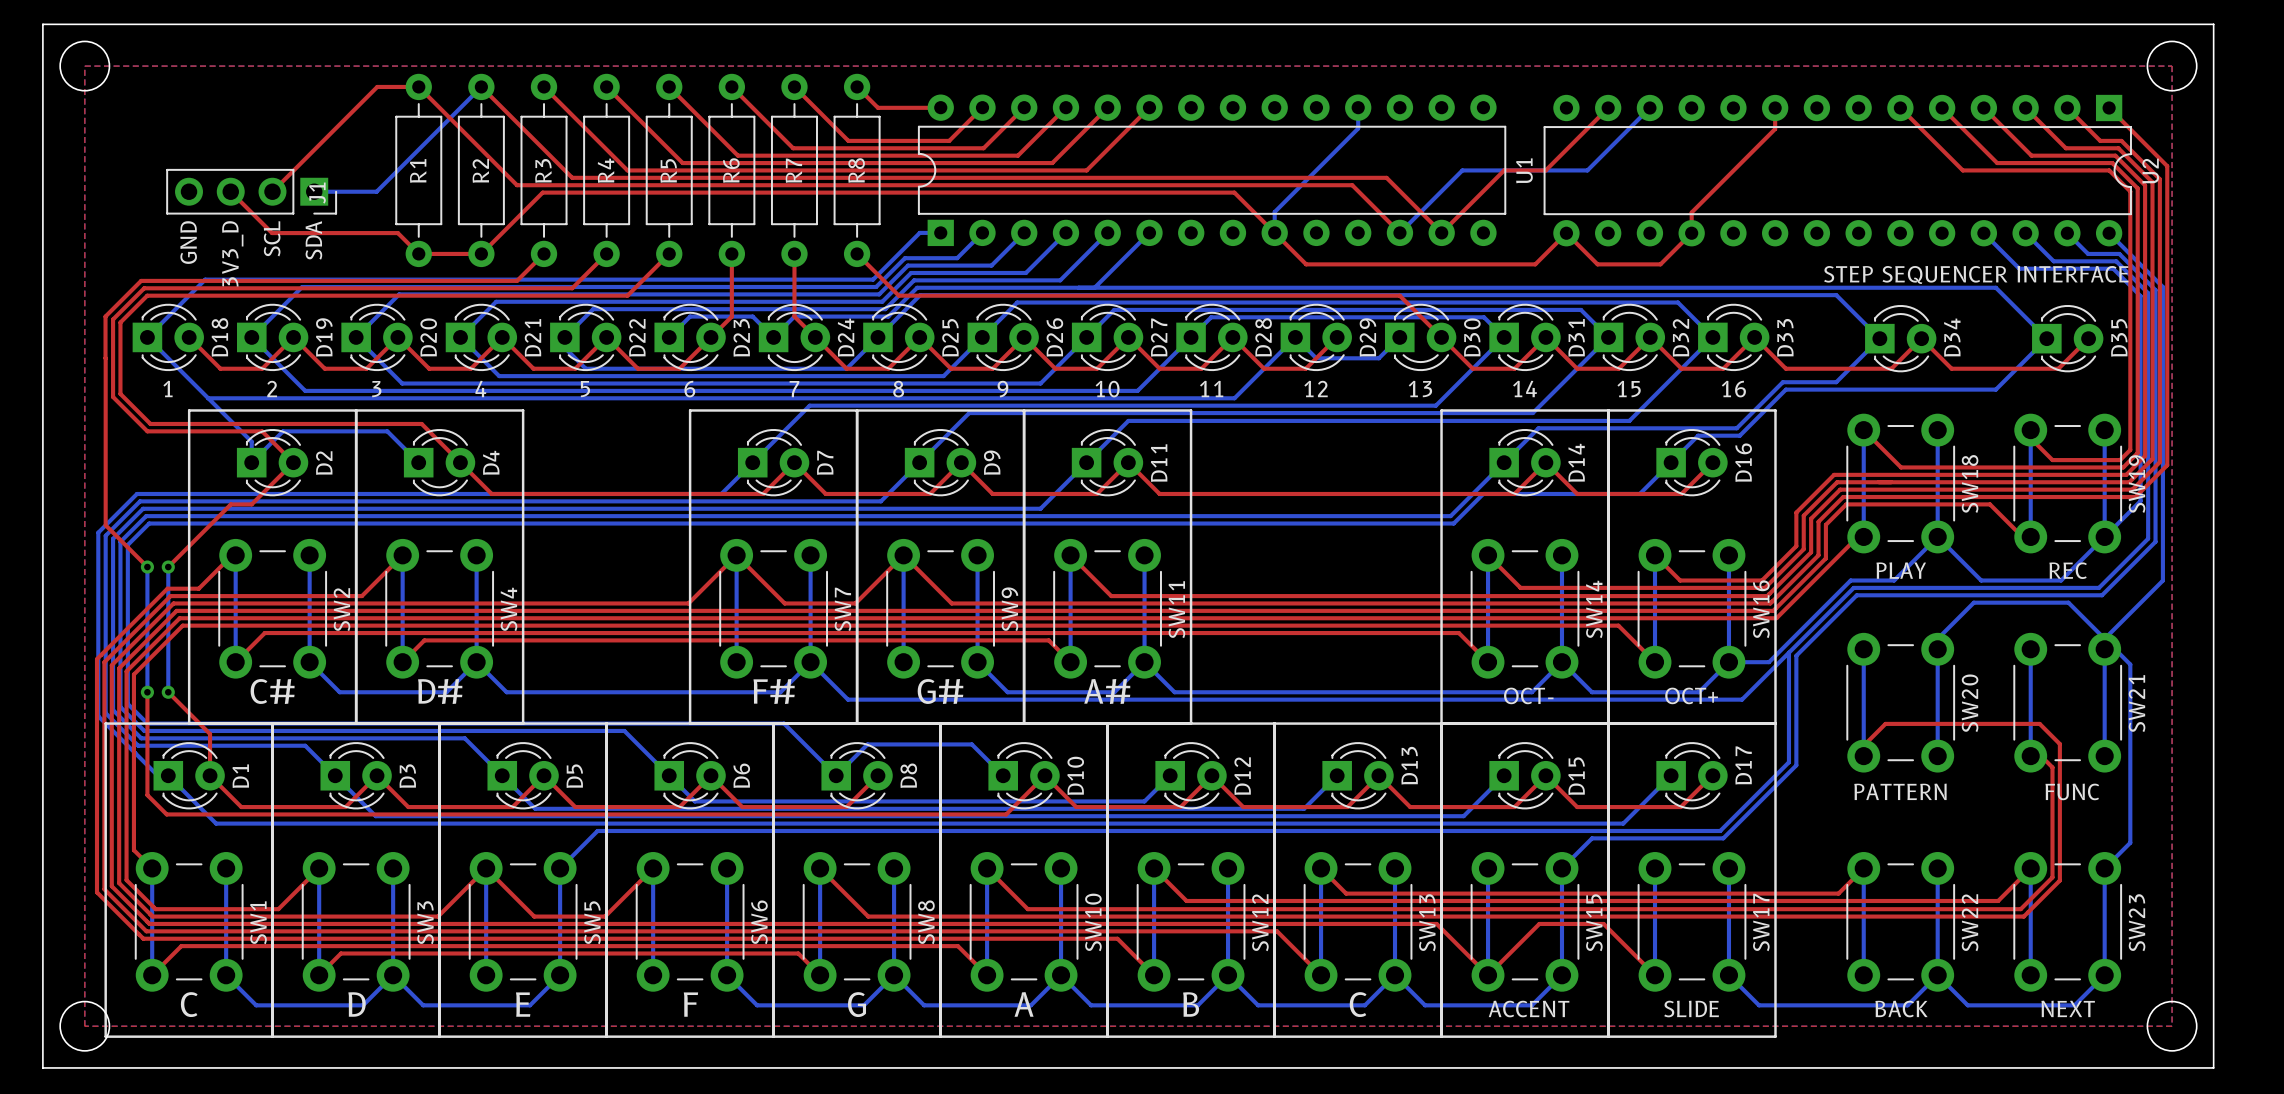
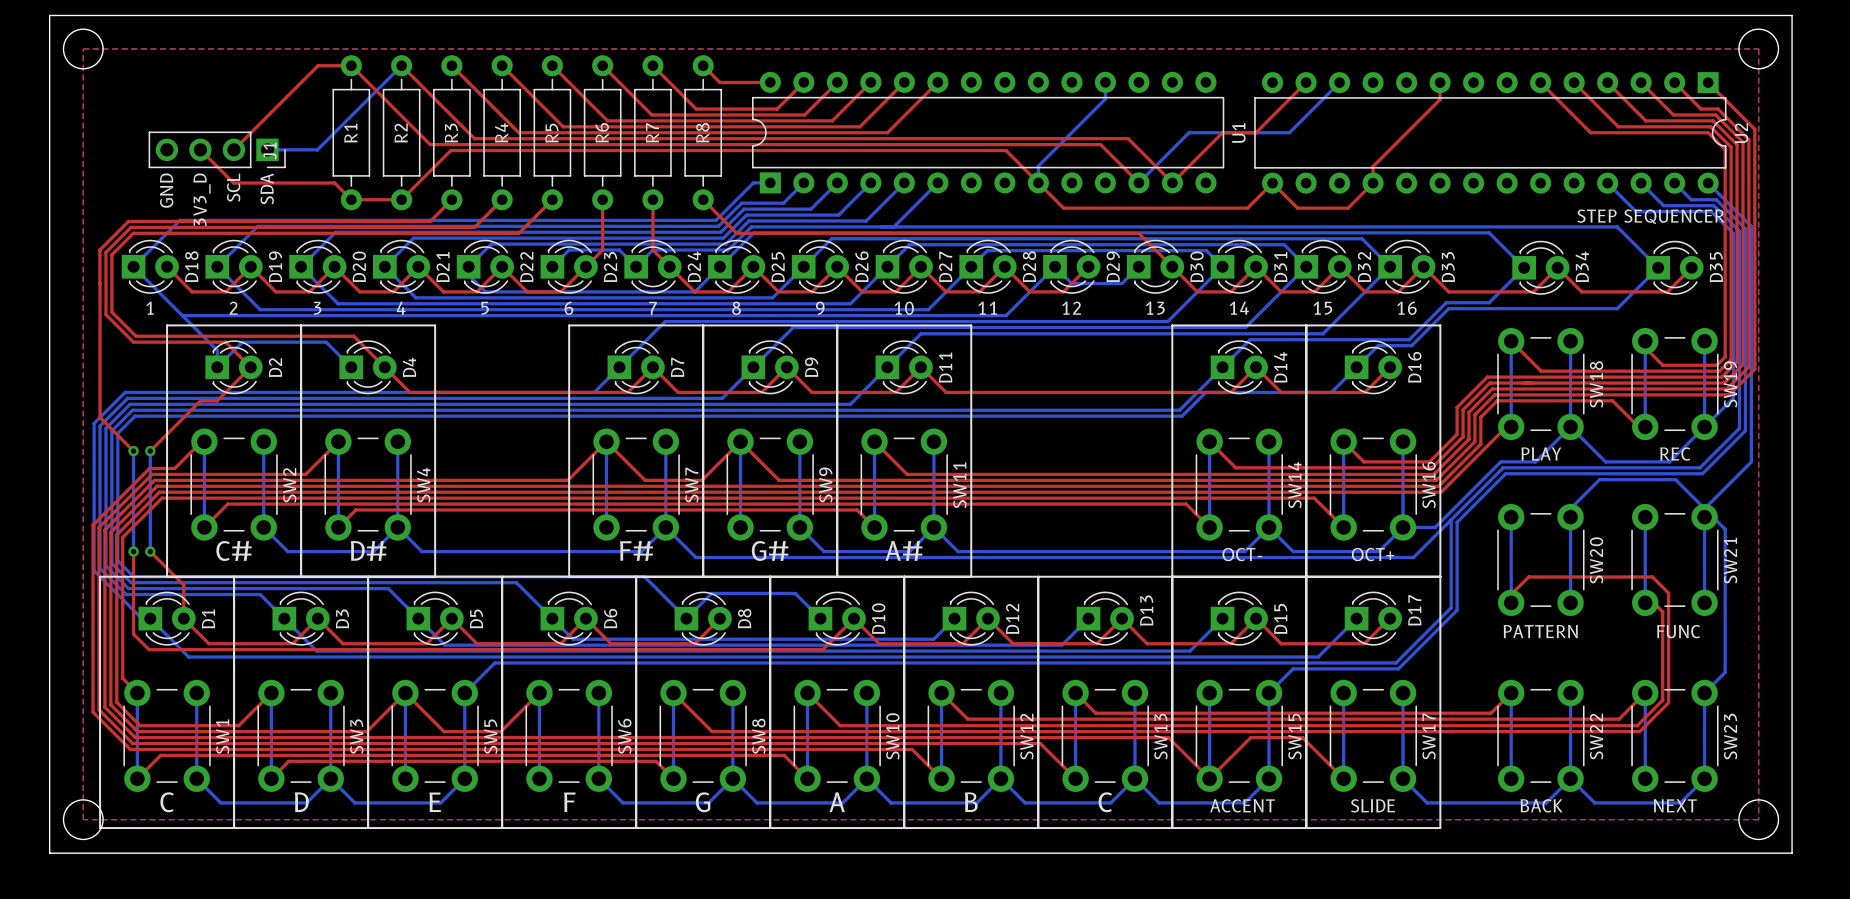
text: STEP SEQUENCER INTERFACE (1976, 274) -> STEP SEQUENCER (1651, 216)

